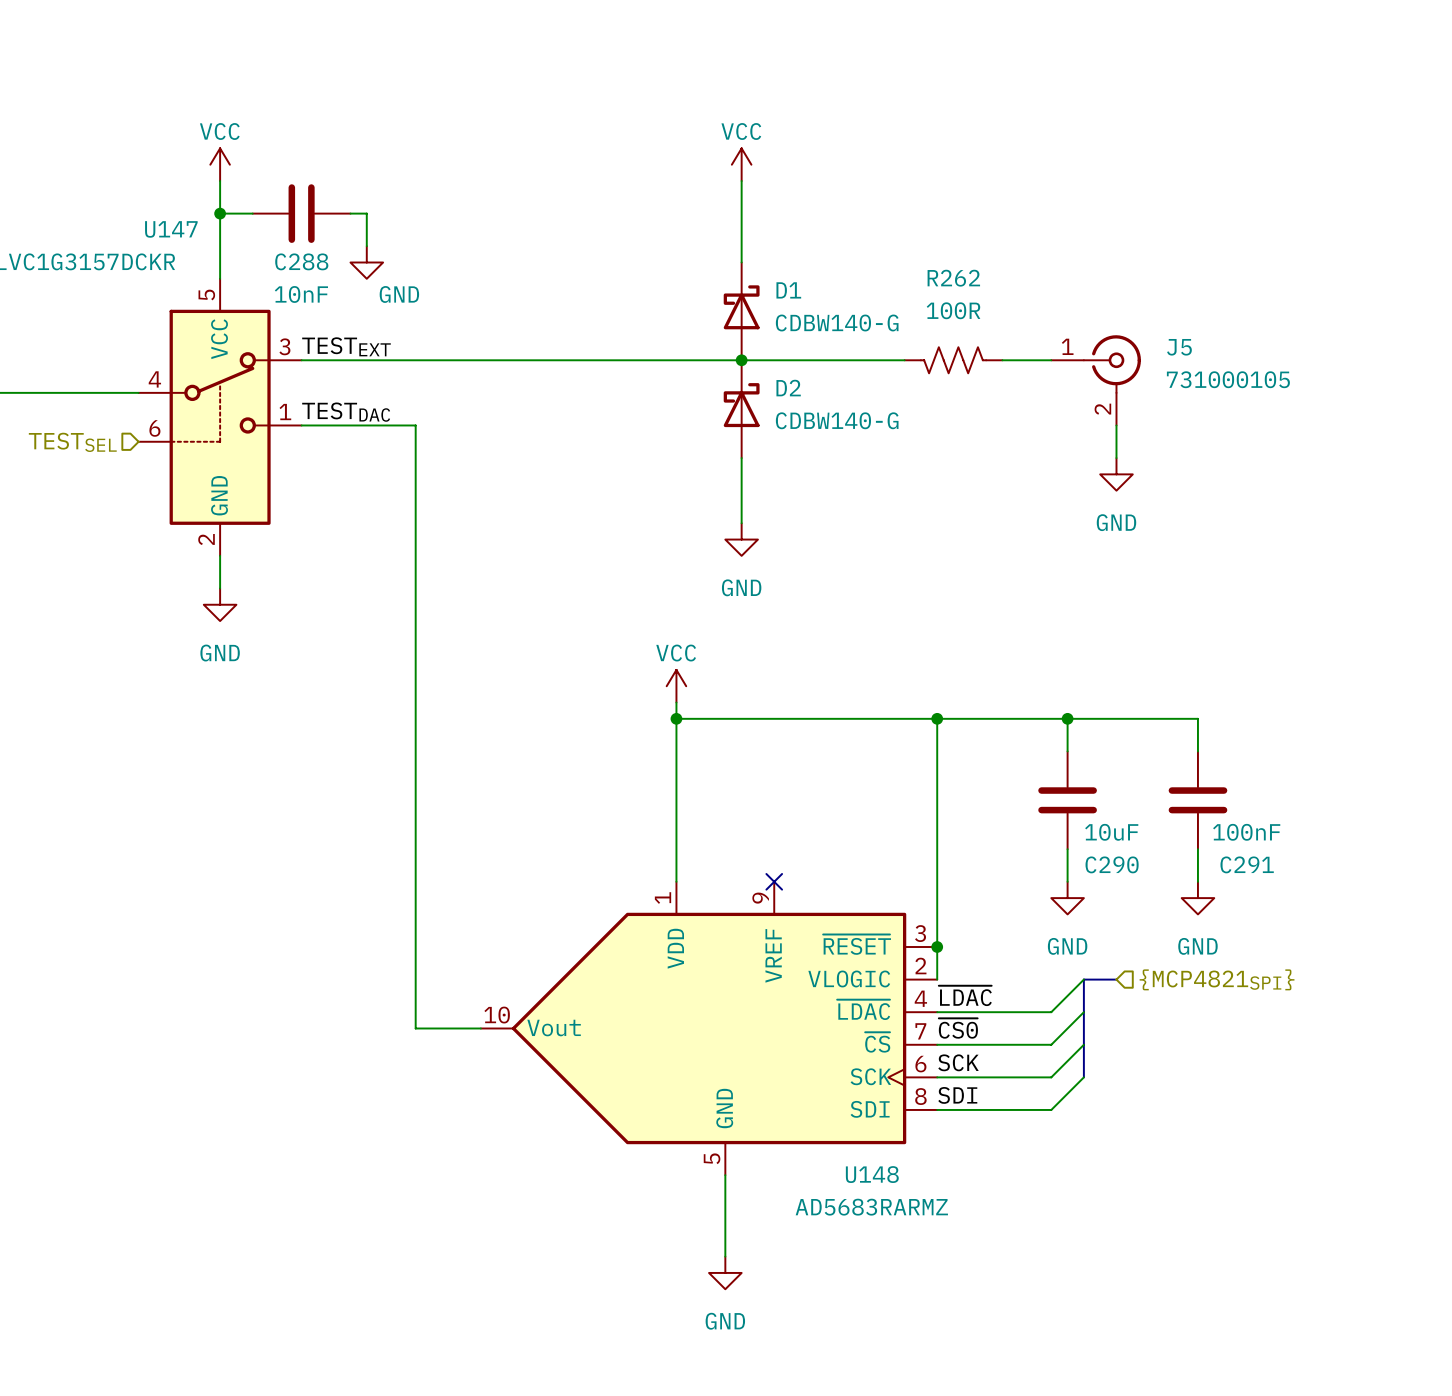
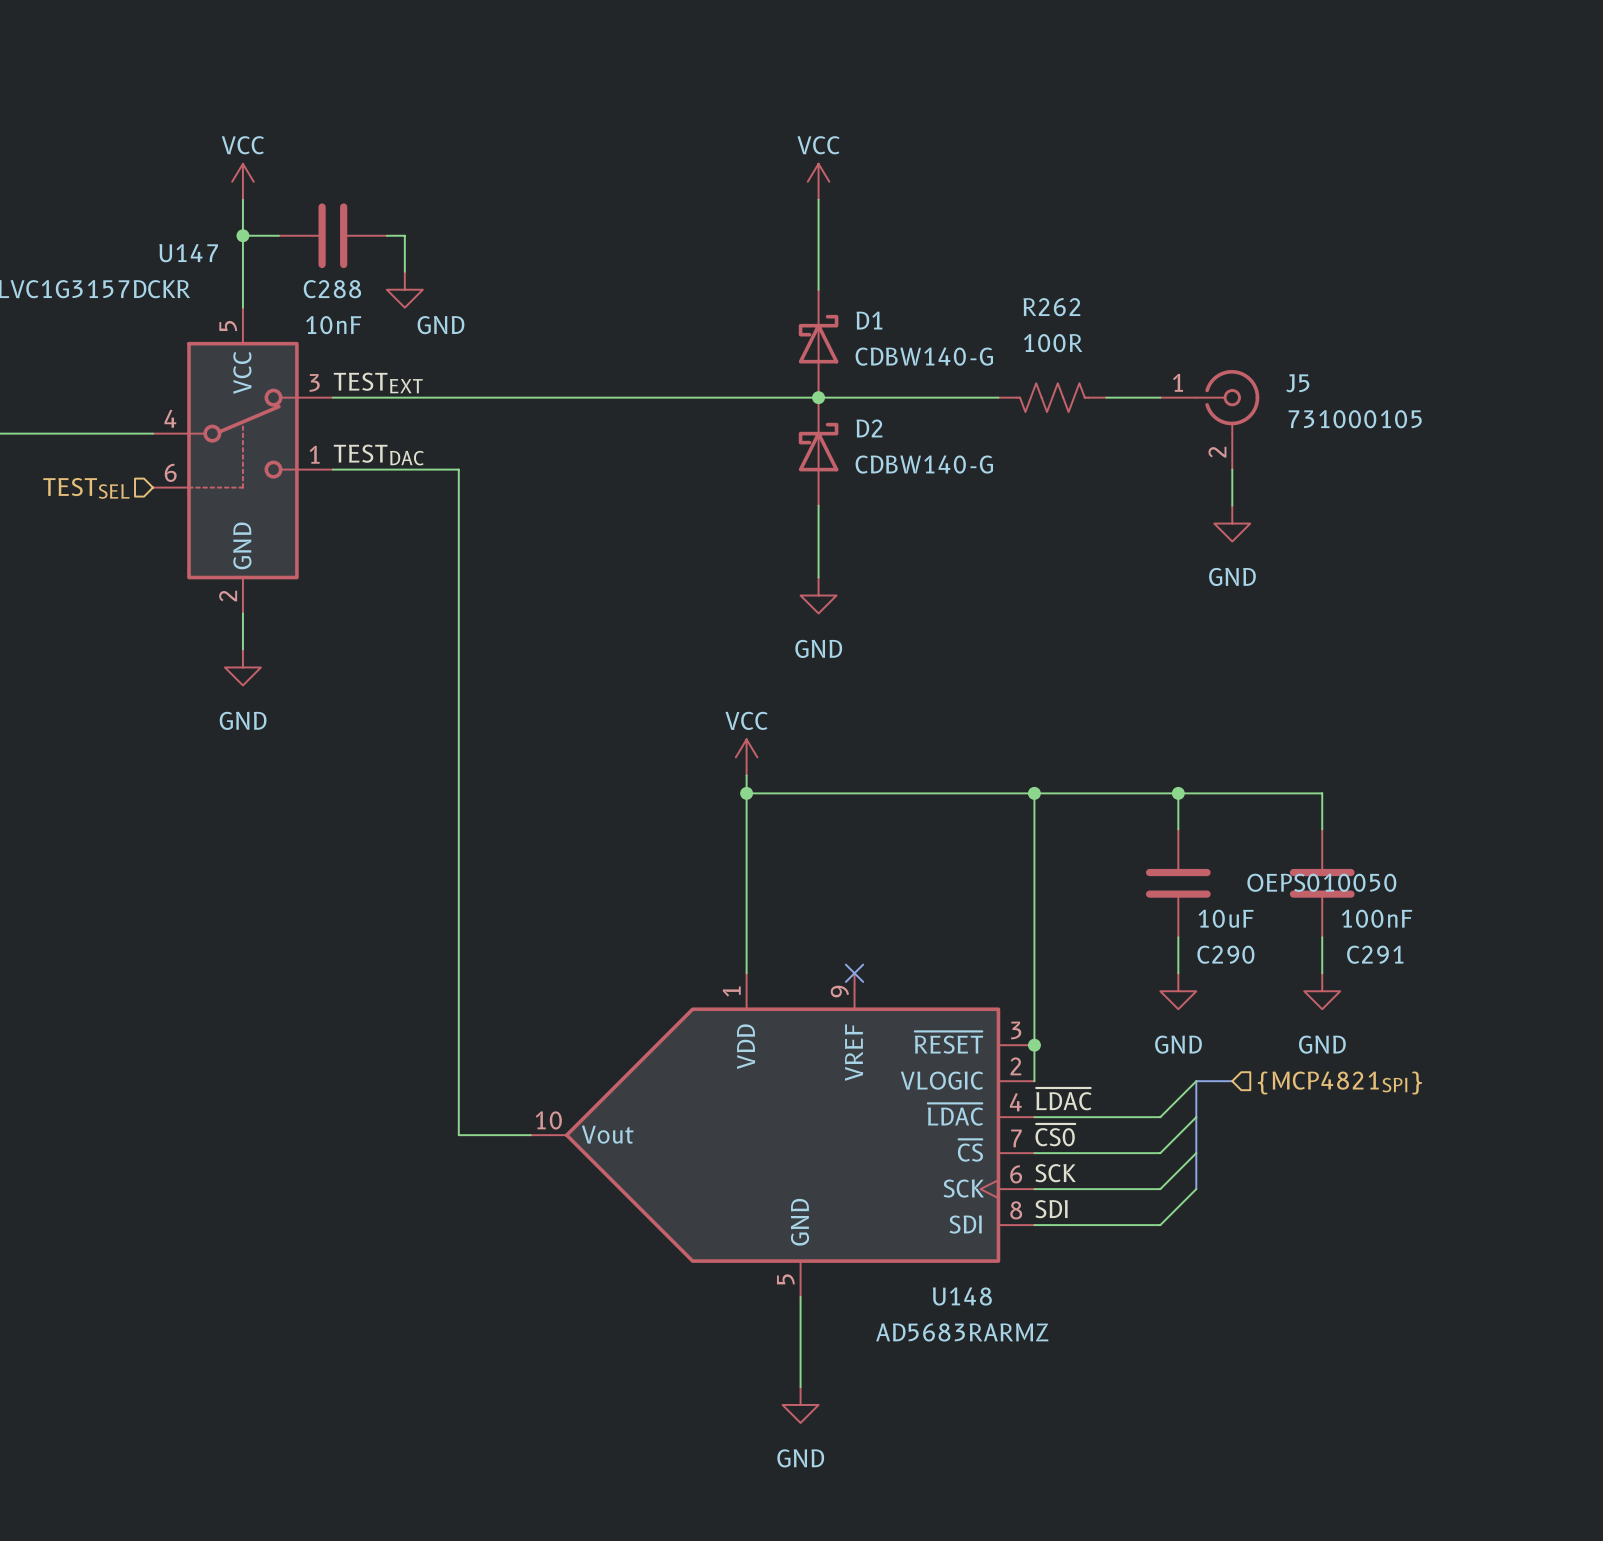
C291 text: none -> OEPS010050 (1321, 882)

